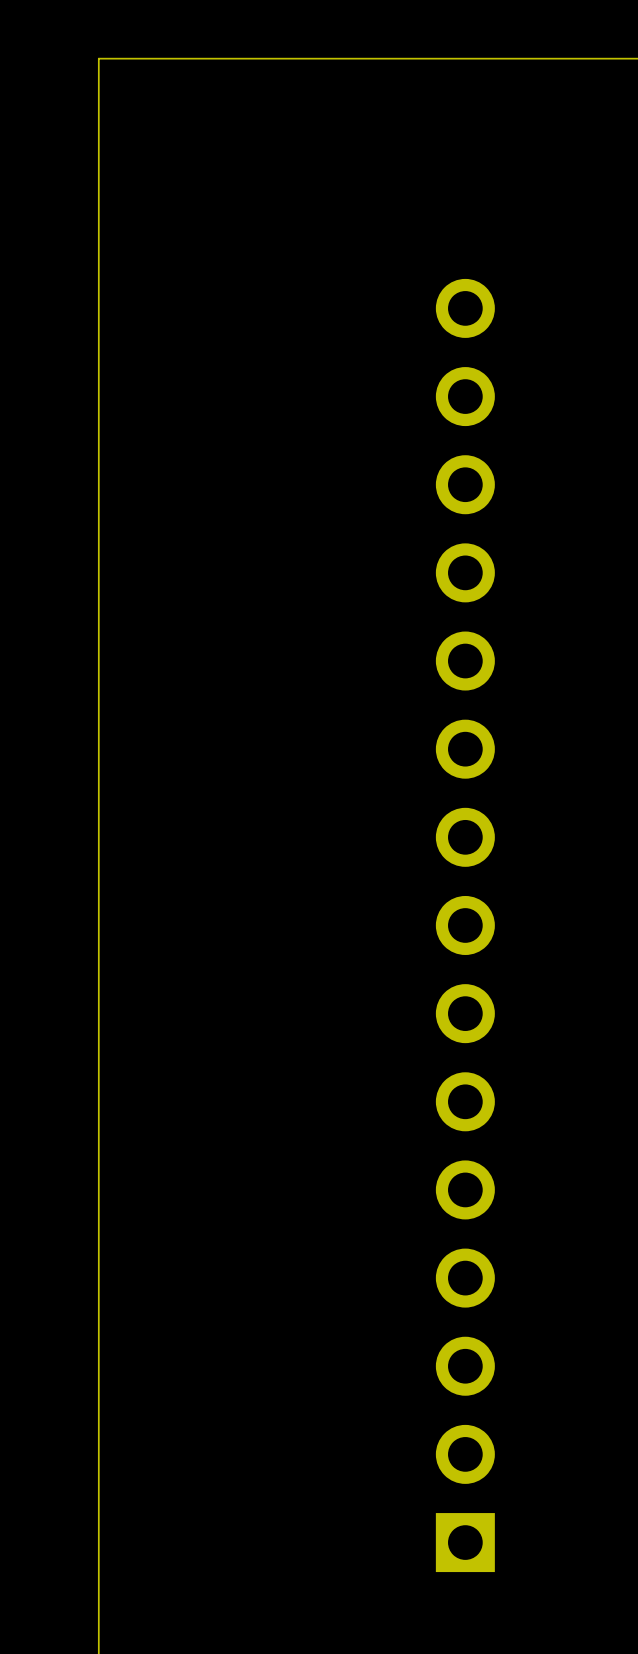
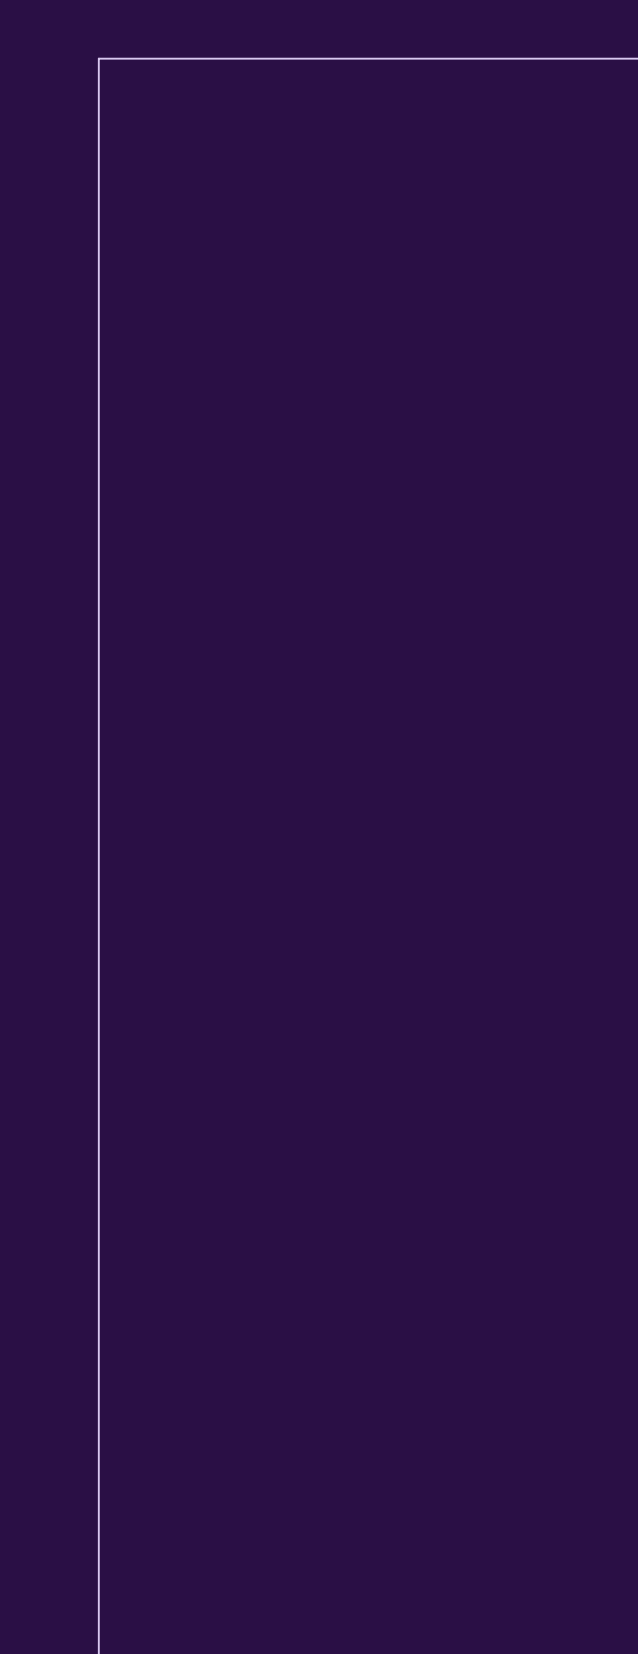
part: (465, 925) -> none

